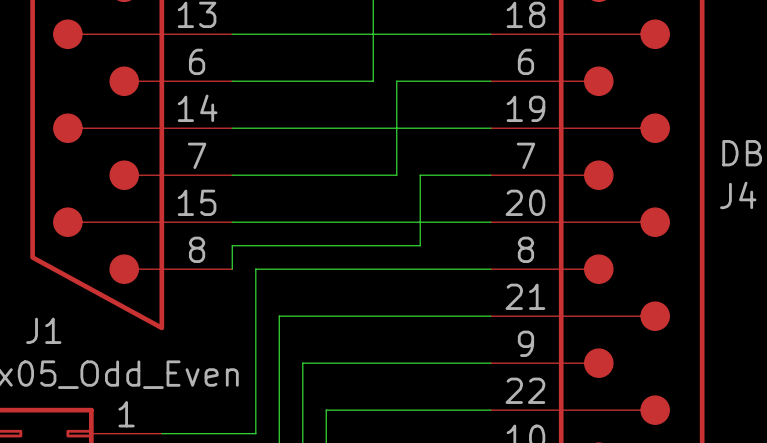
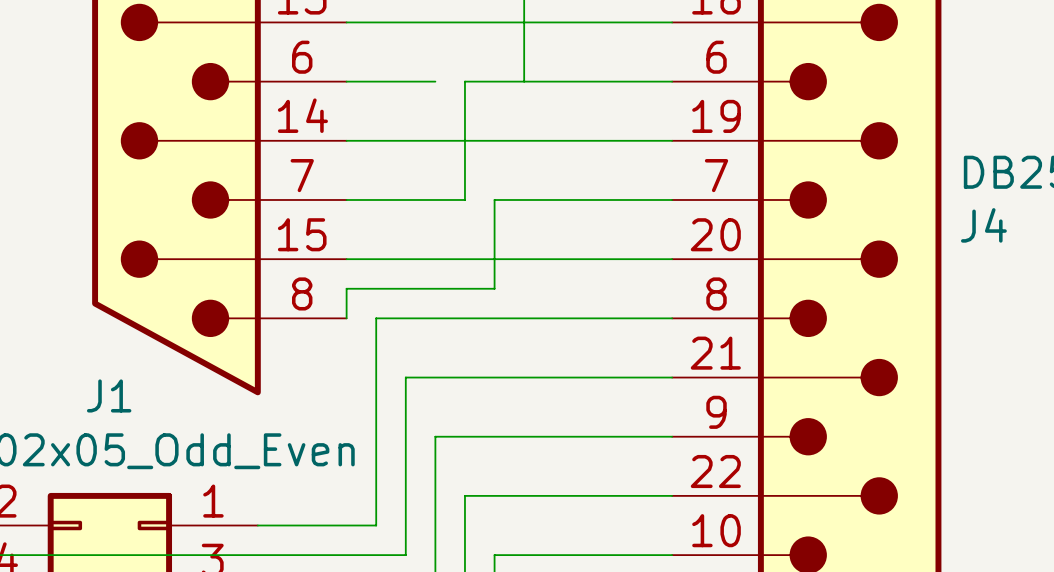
wire: (302, 81) (326, 81) -> (524, 81) (553, 81)
wire: (396, 81) (396, 175) -> (583, 199) (553, 199)
wire: (326, 175) (349, 175) -> (464, 199) (464, 81)
wire: (420, 175) (420, 245) (349, 245) -> (494, 199) (494, 288)

